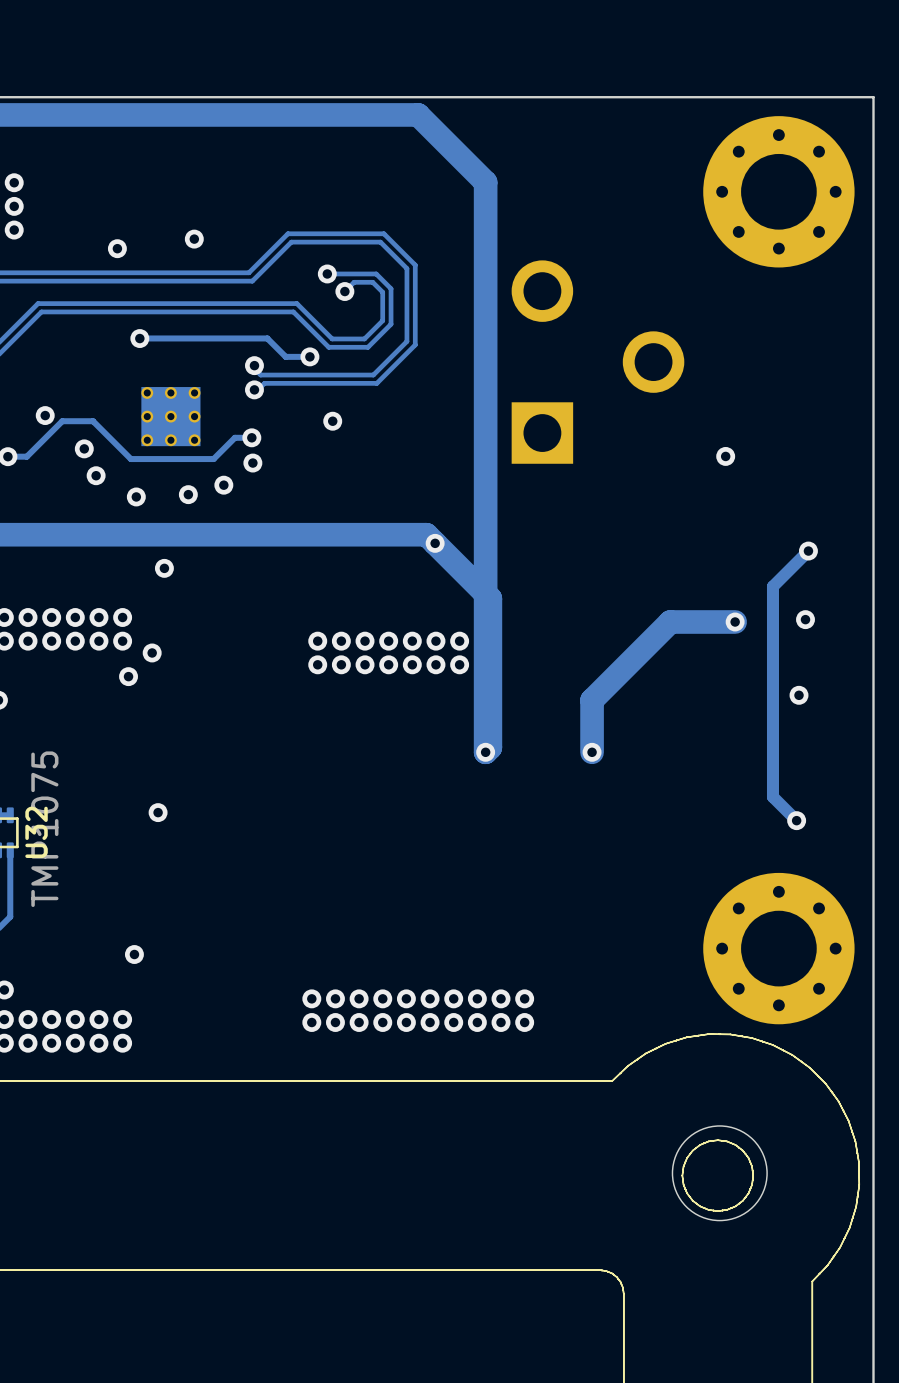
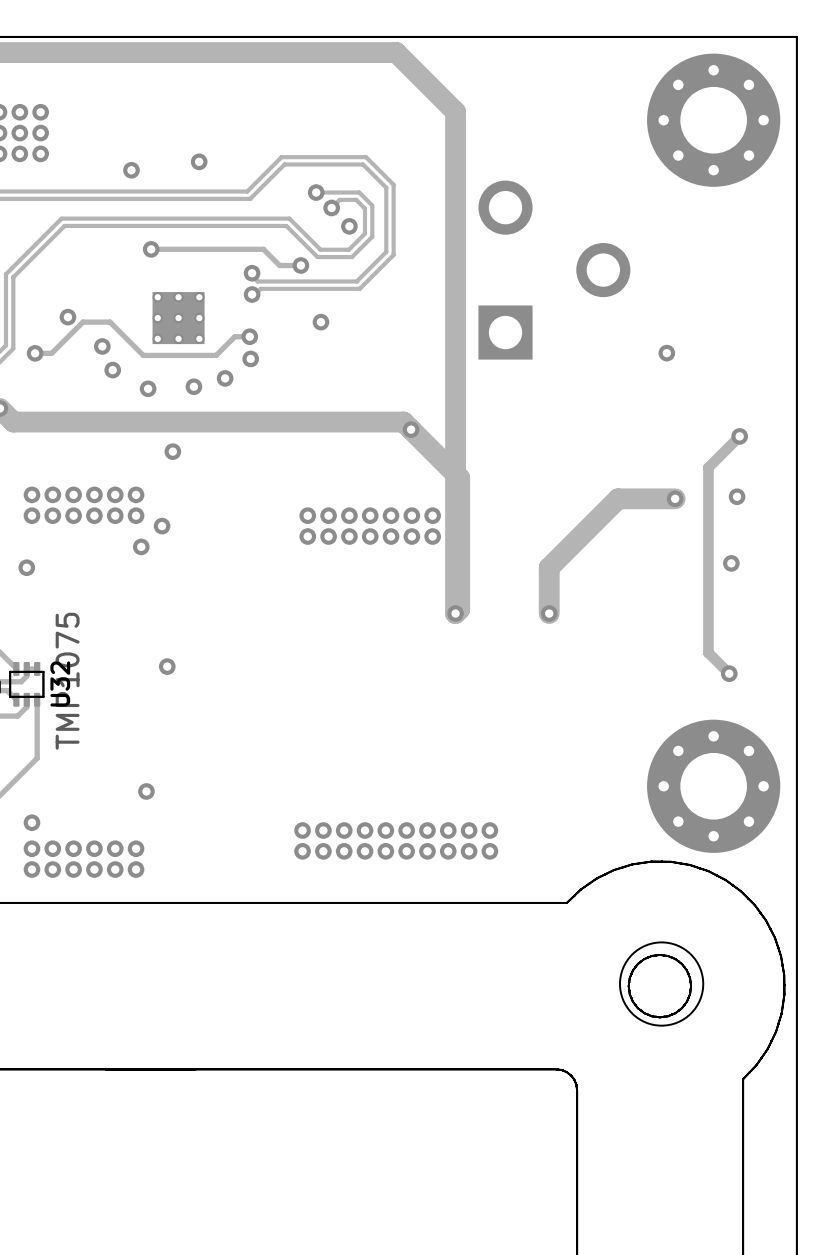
via: none -> (349, 226)

